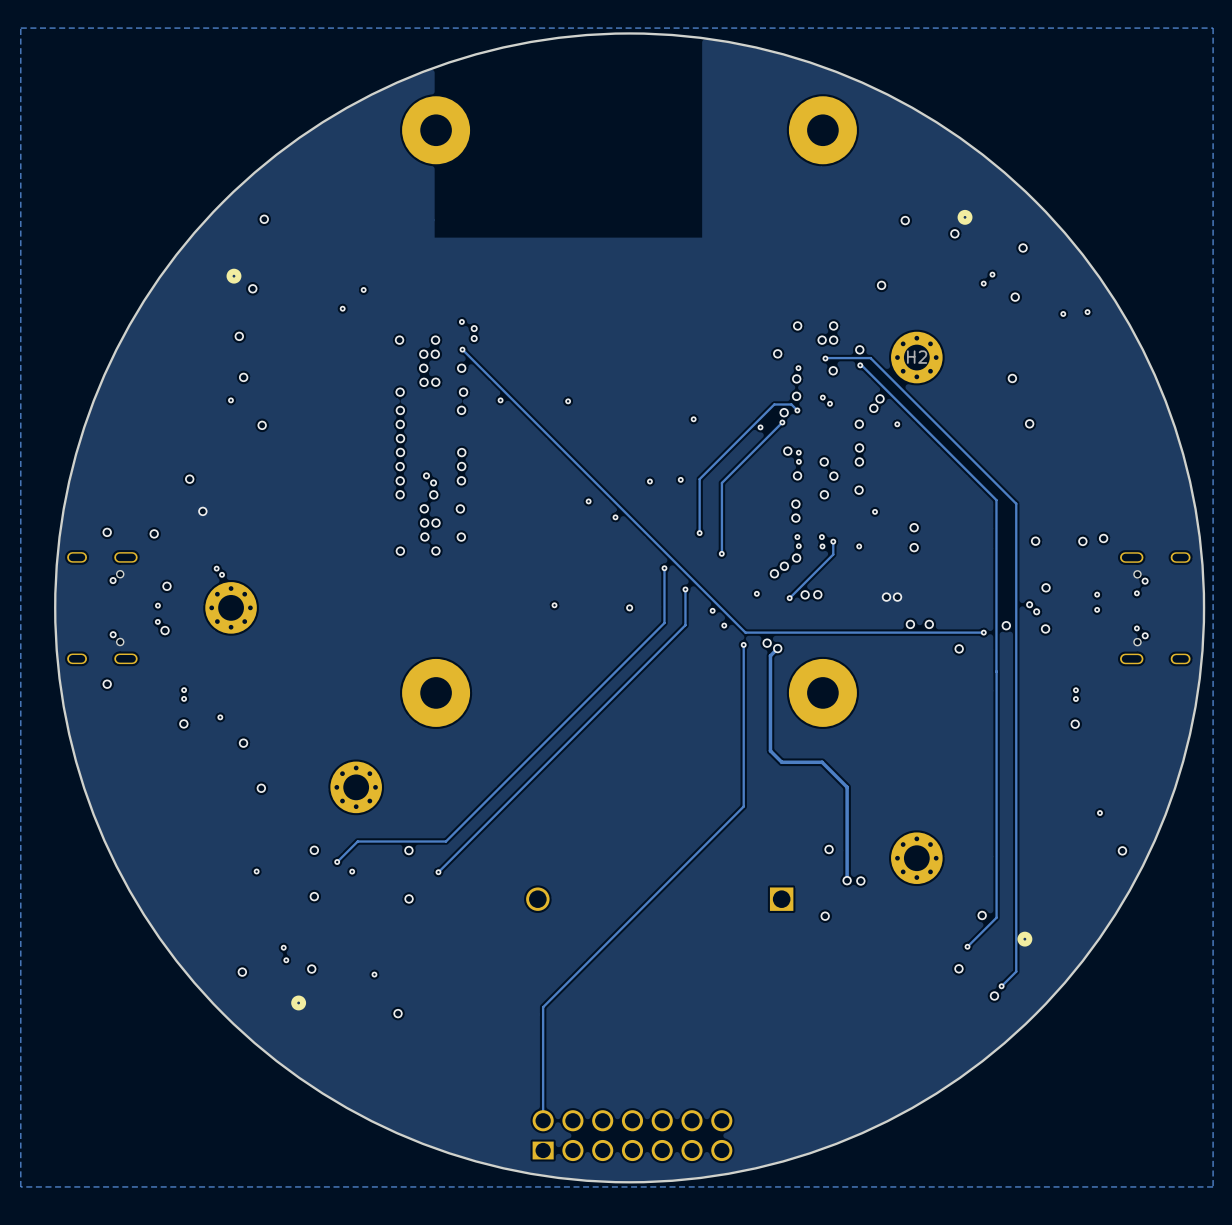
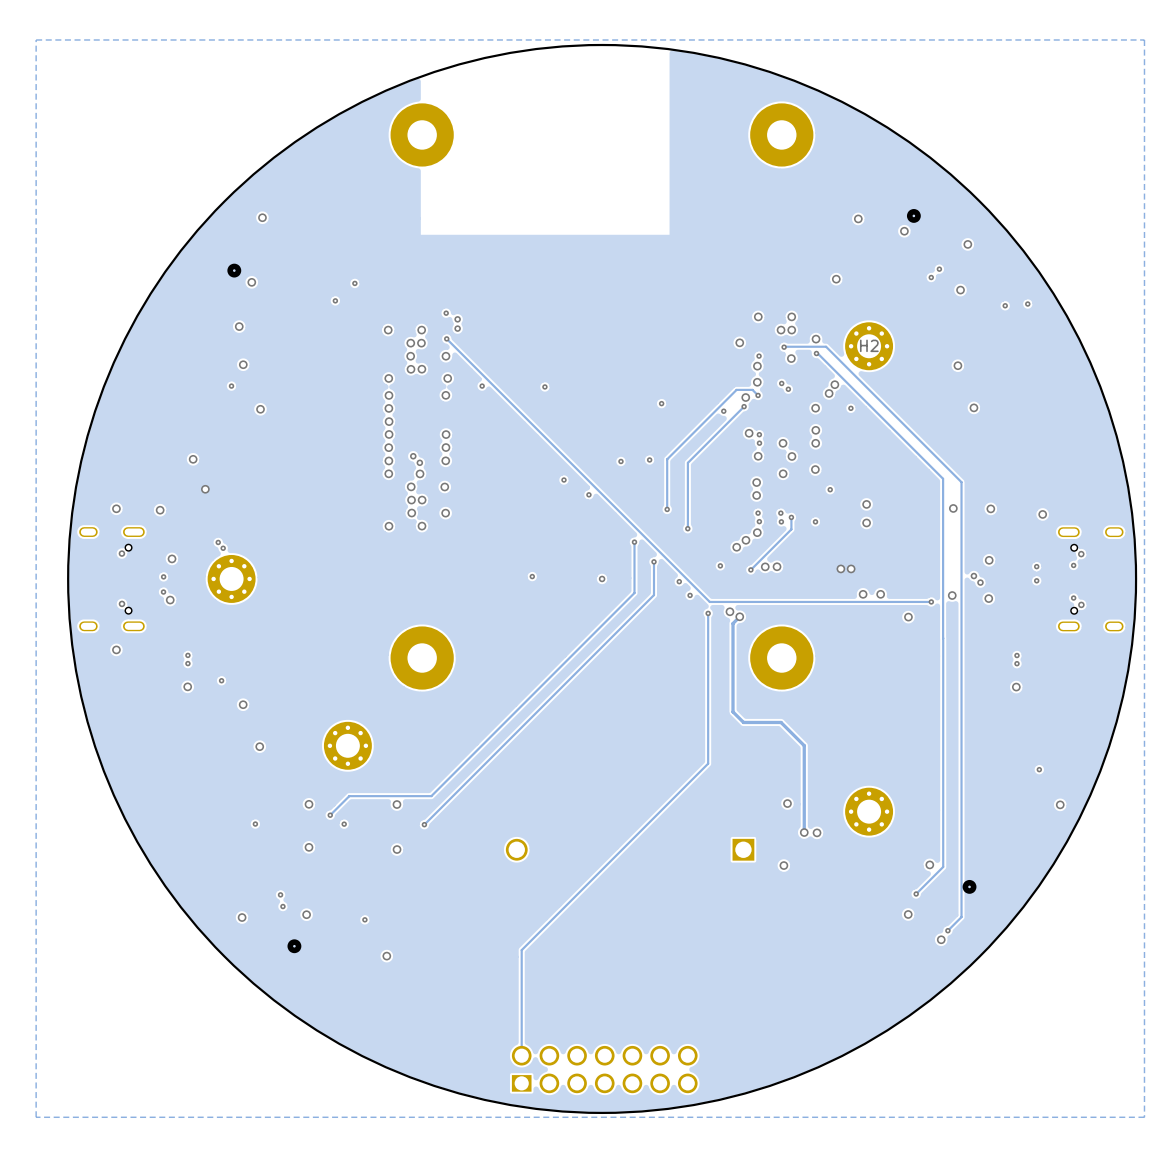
via: none -> (953, 508)
via: none -> (990, 508)
via: (1035, 541) -> none
via: (1082, 541) -> none

